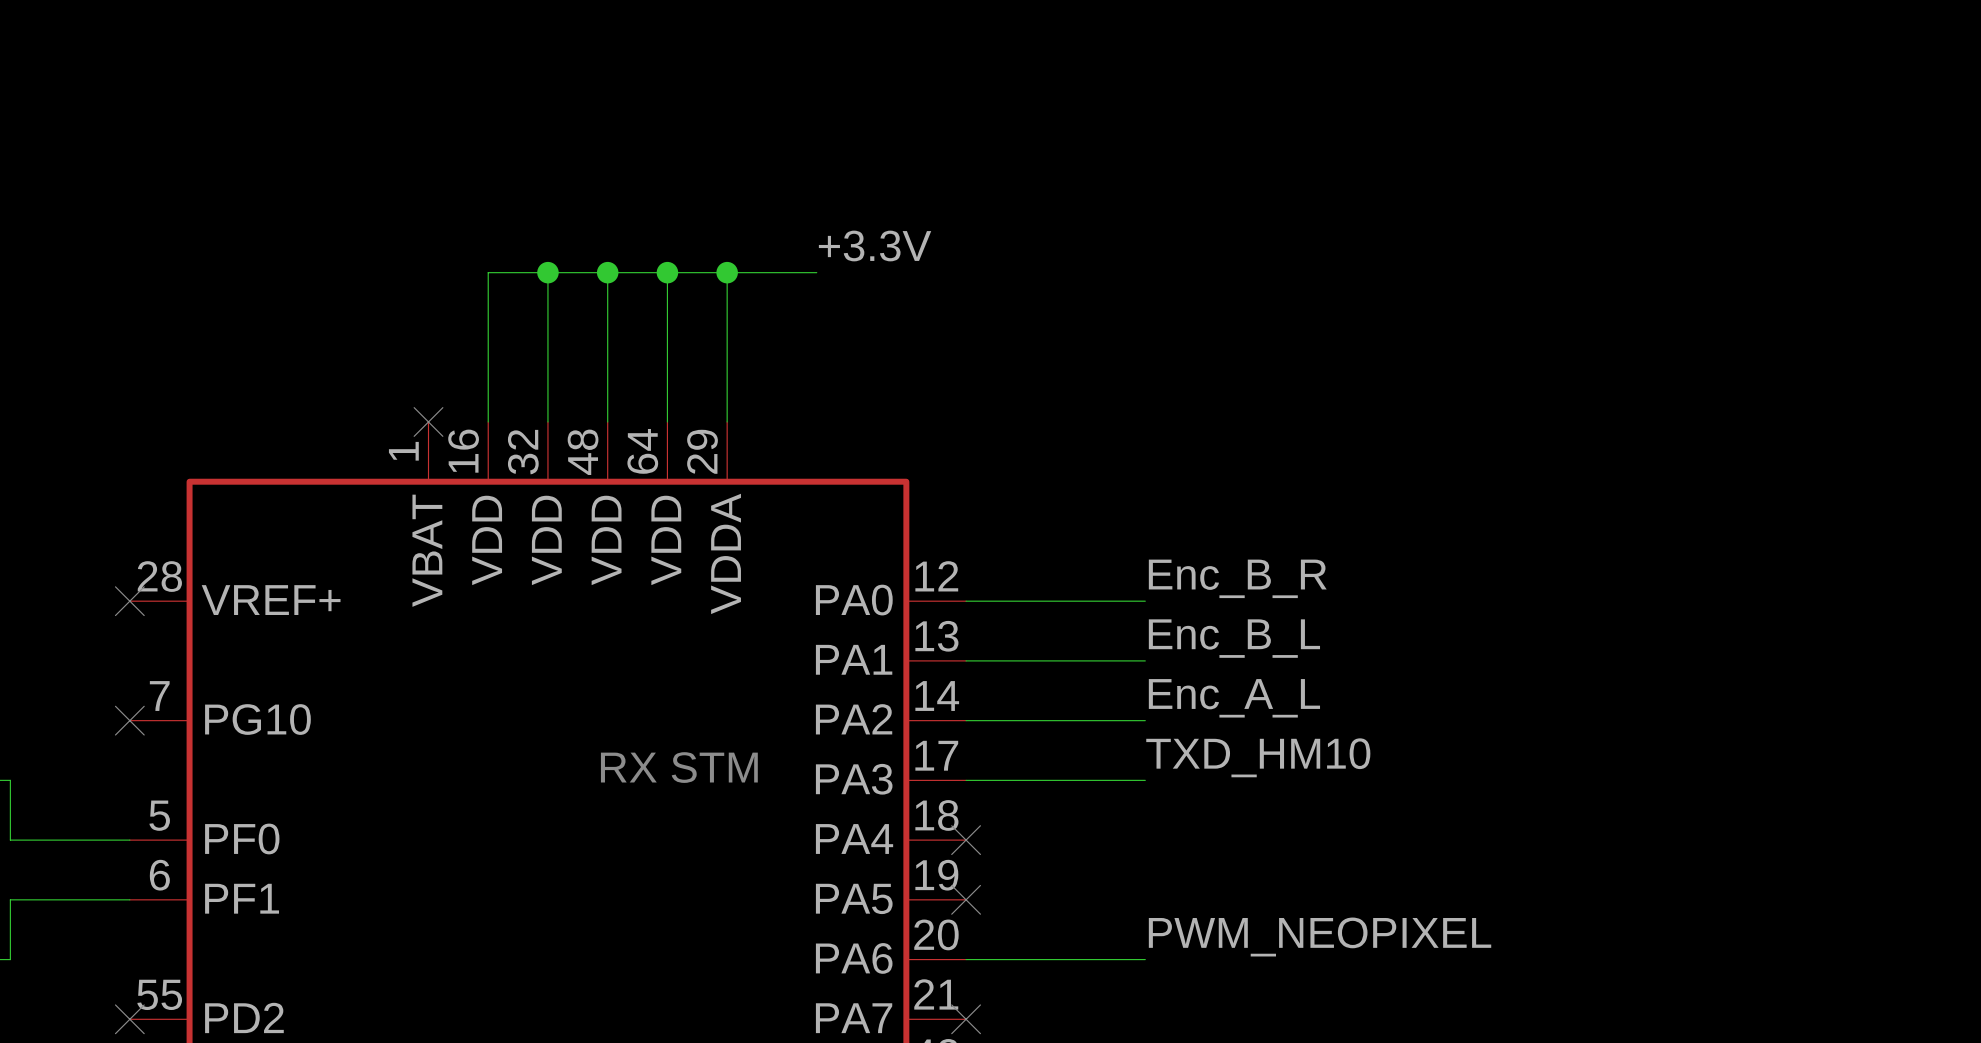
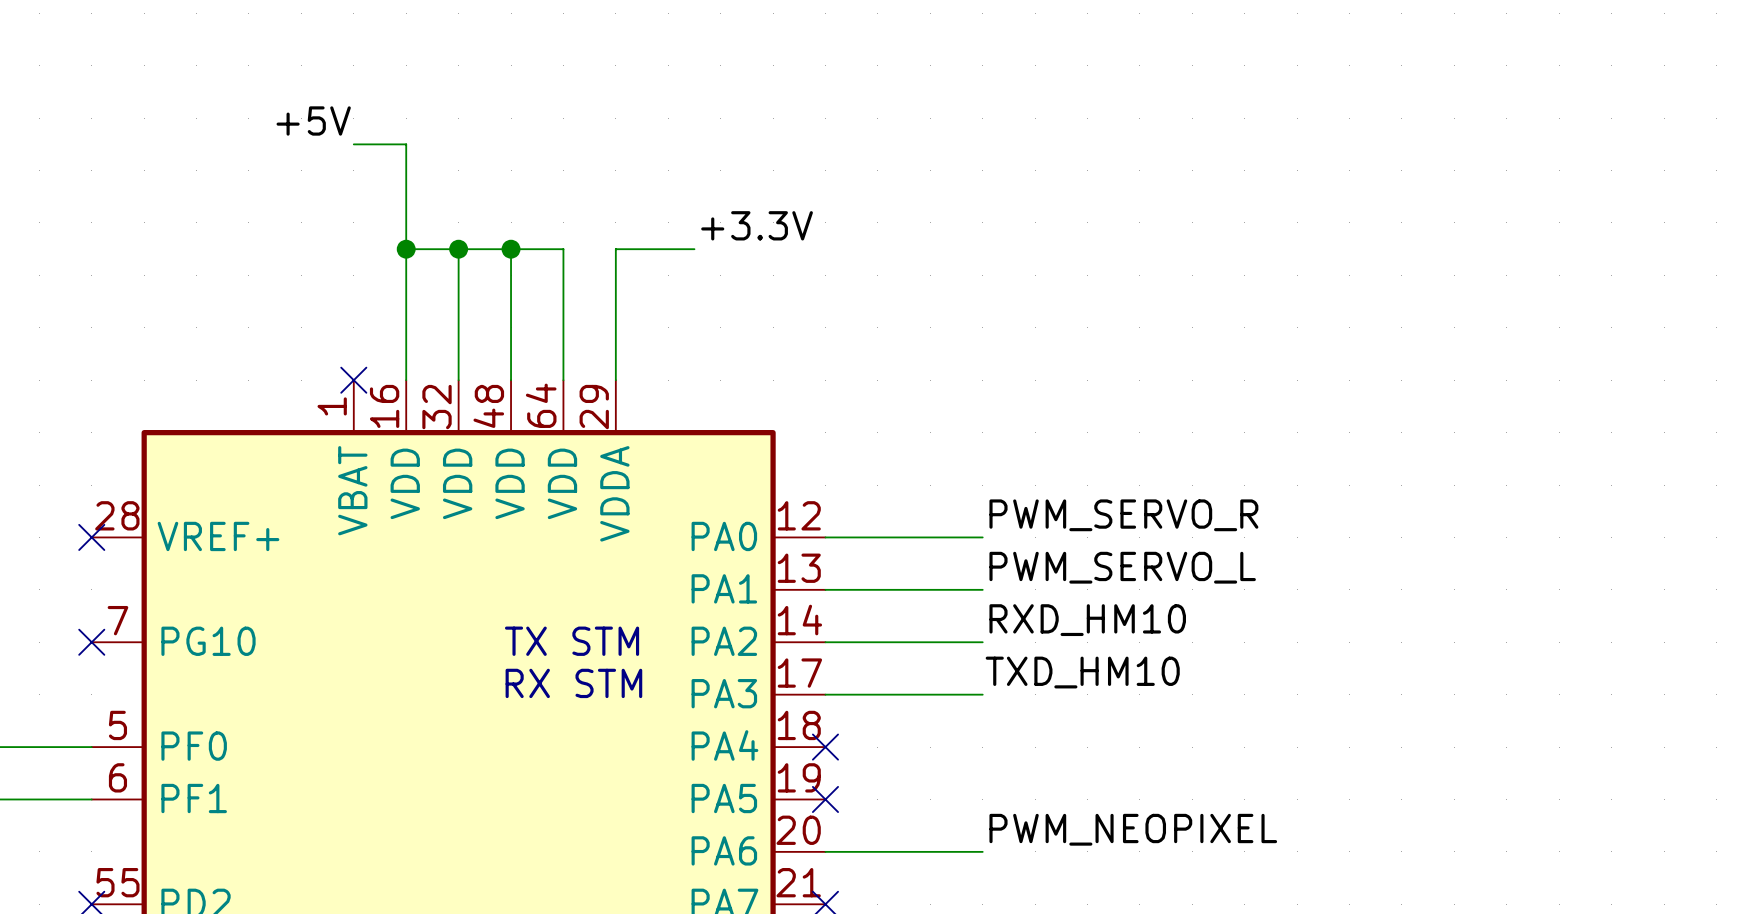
label: none -> +5V (313, 120)
wire: none -> (353, 144) (406, 144) (406, 249)
junction: none -> (406, 249)
wire: (667, 272) (727, 272) -> none
junction: (667, 272) -> none
junction: (727, 272) -> none
label: Enc_B_R (1237, 578) -> PWM_SERVO_R (1123, 515)
label: Enc_B_L (1234, 638) -> PWM_SERVO_L (1122, 567)
label: Enc_A_L (1234, 698) -> RXD_HM10 (1087, 620)
text: none -> TX STM (572, 641)

